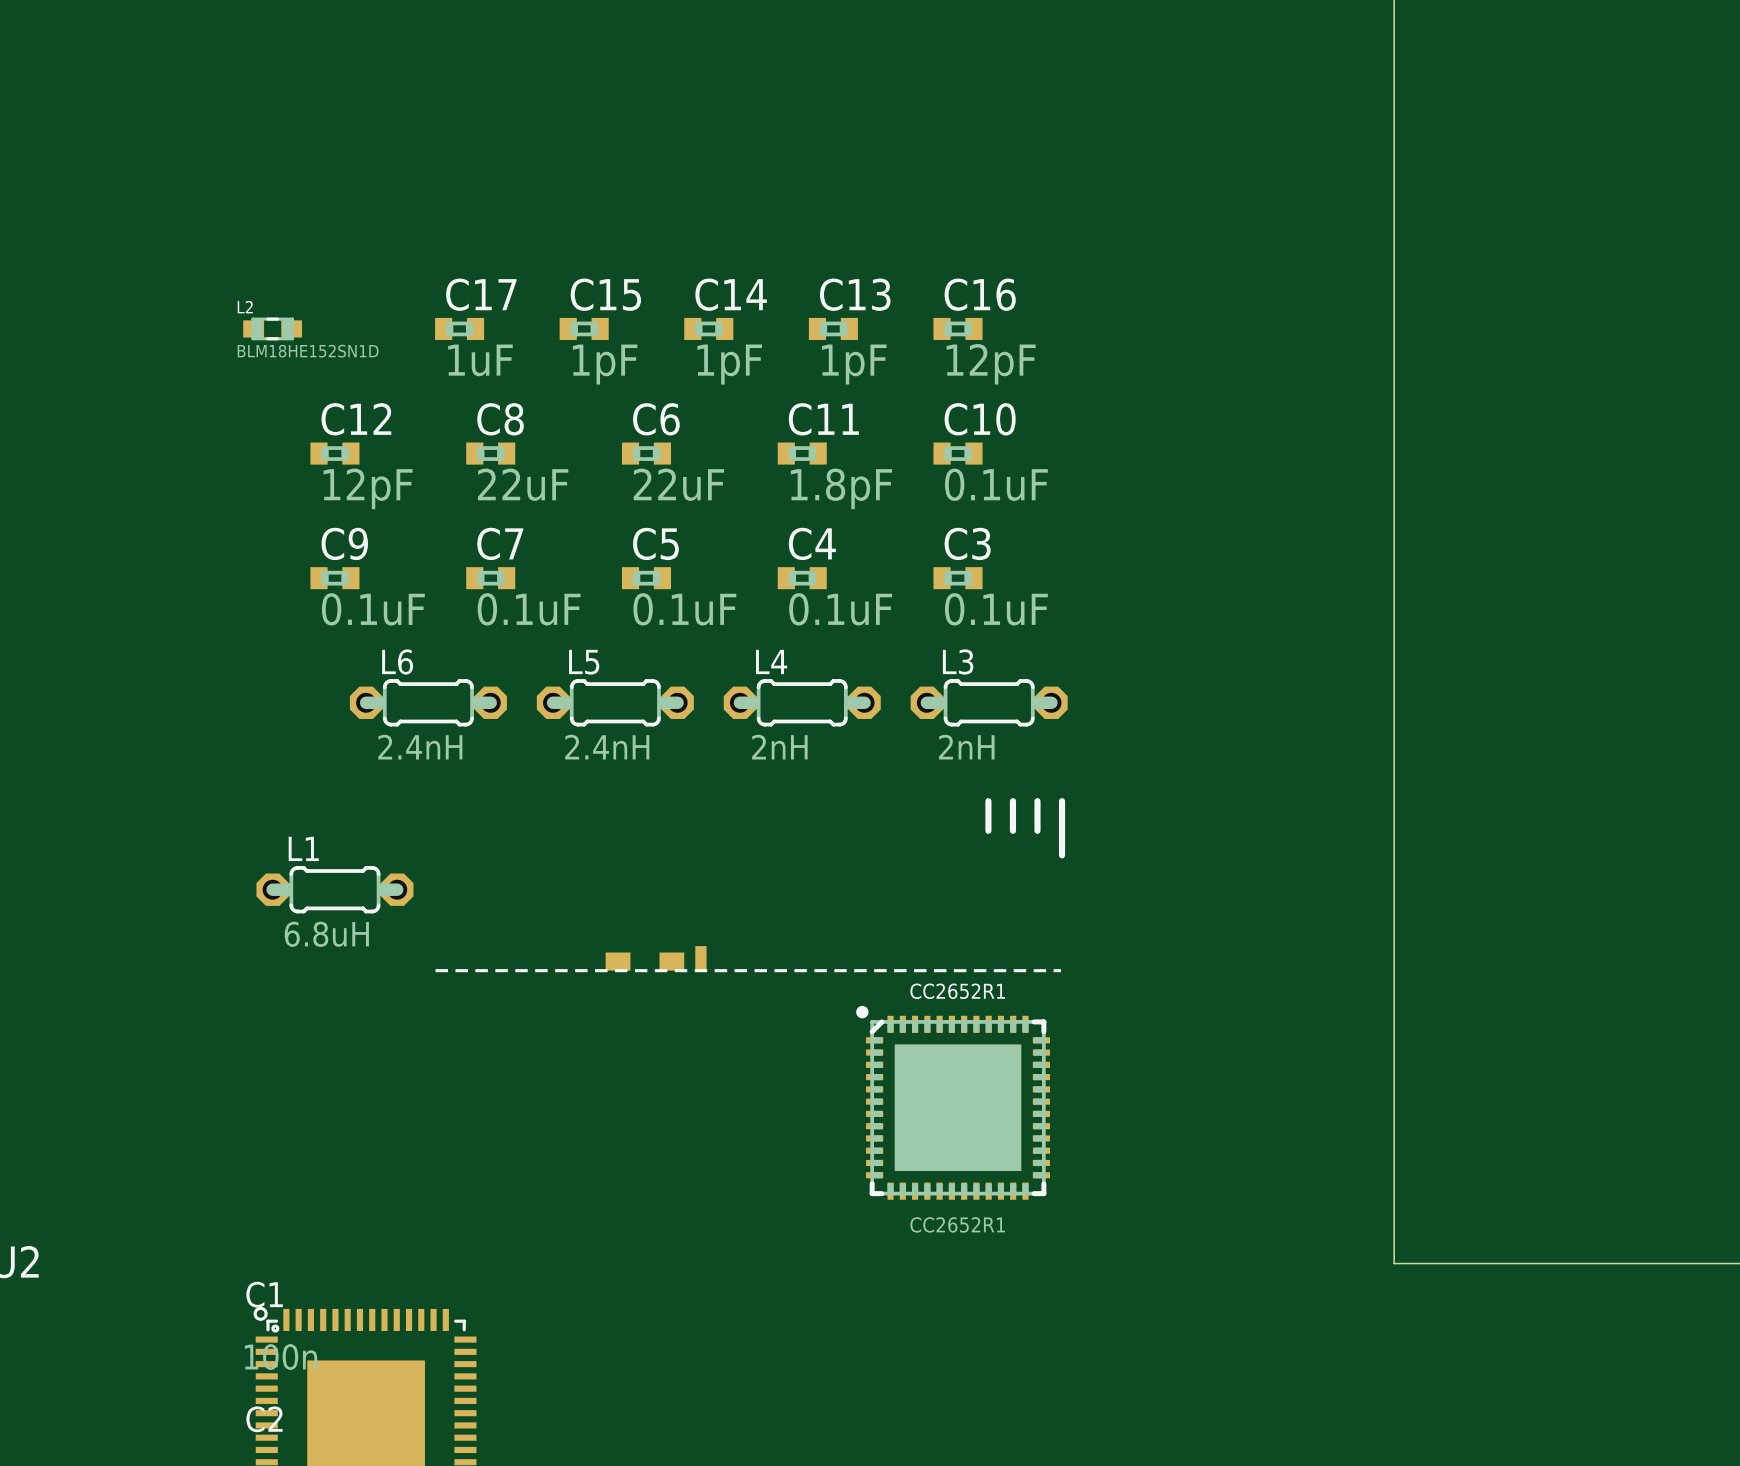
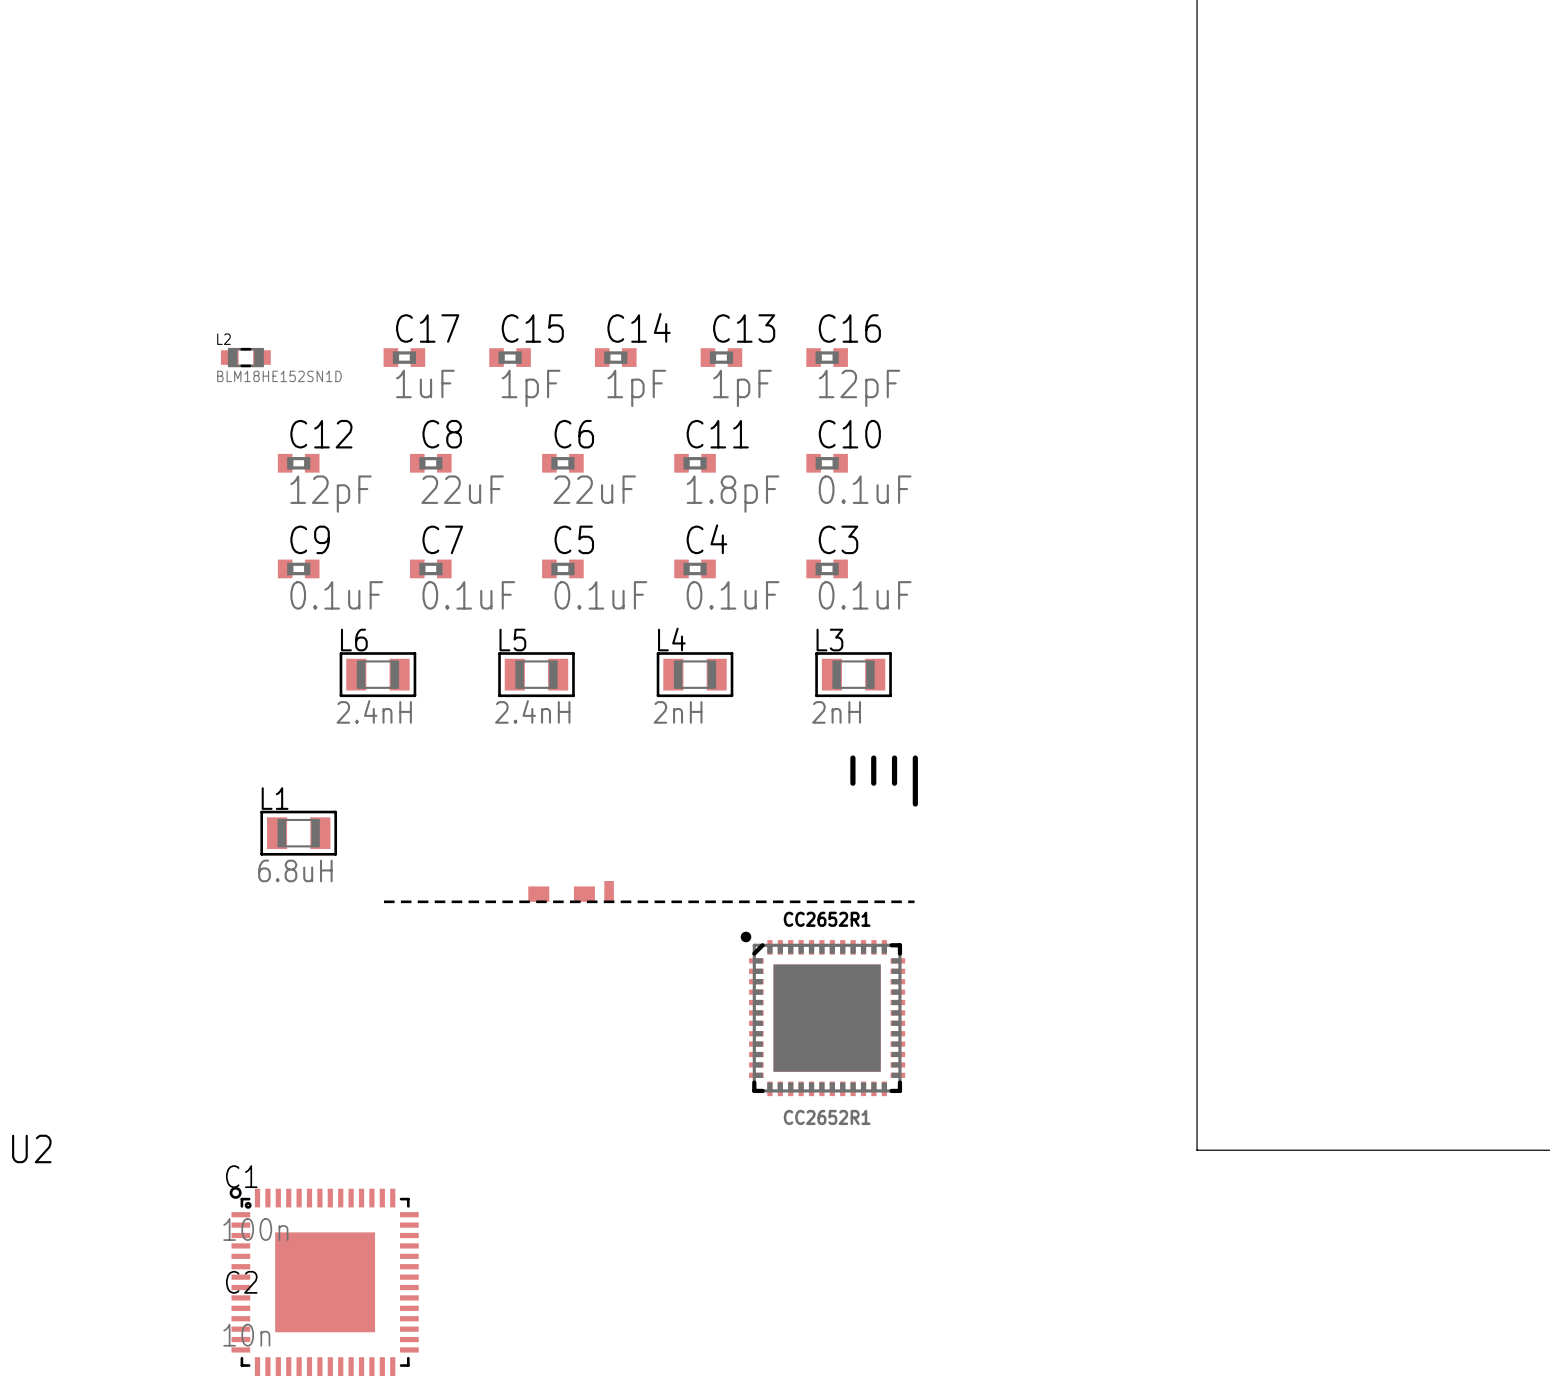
L6 footprint: [349, 679, 507, 727] -> [339, 652, 417, 698]
L5 footprint: [536, 679, 694, 727] -> [498, 652, 575, 698]
L4 footprint: [723, 679, 881, 727] -> [656, 652, 734, 698]
L3 footprint: [910, 679, 1068, 727] -> [815, 652, 892, 698]
L1 footprint: [256, 866, 414, 914] -> [260, 810, 338, 856]

